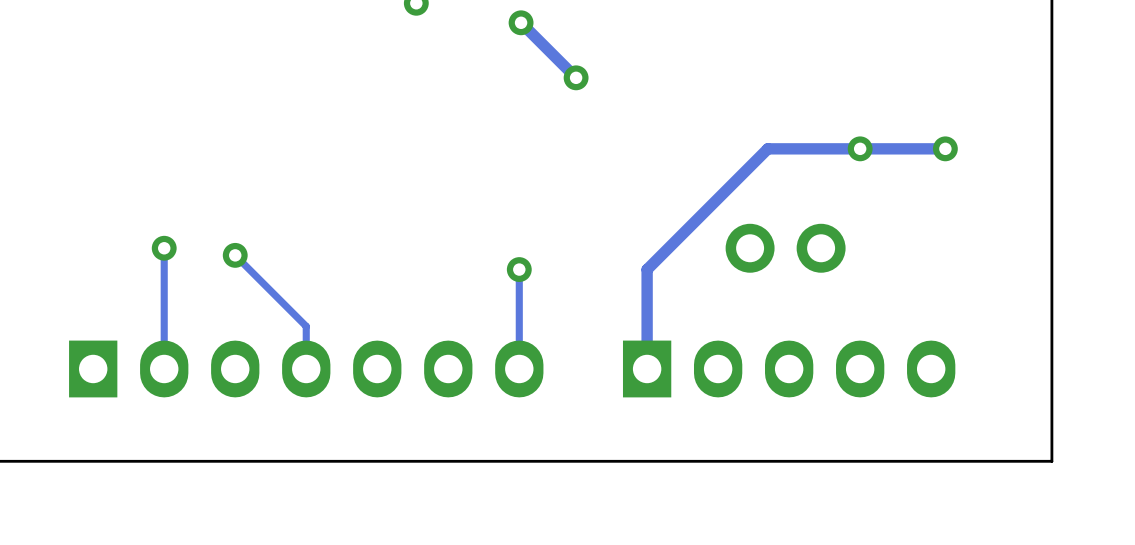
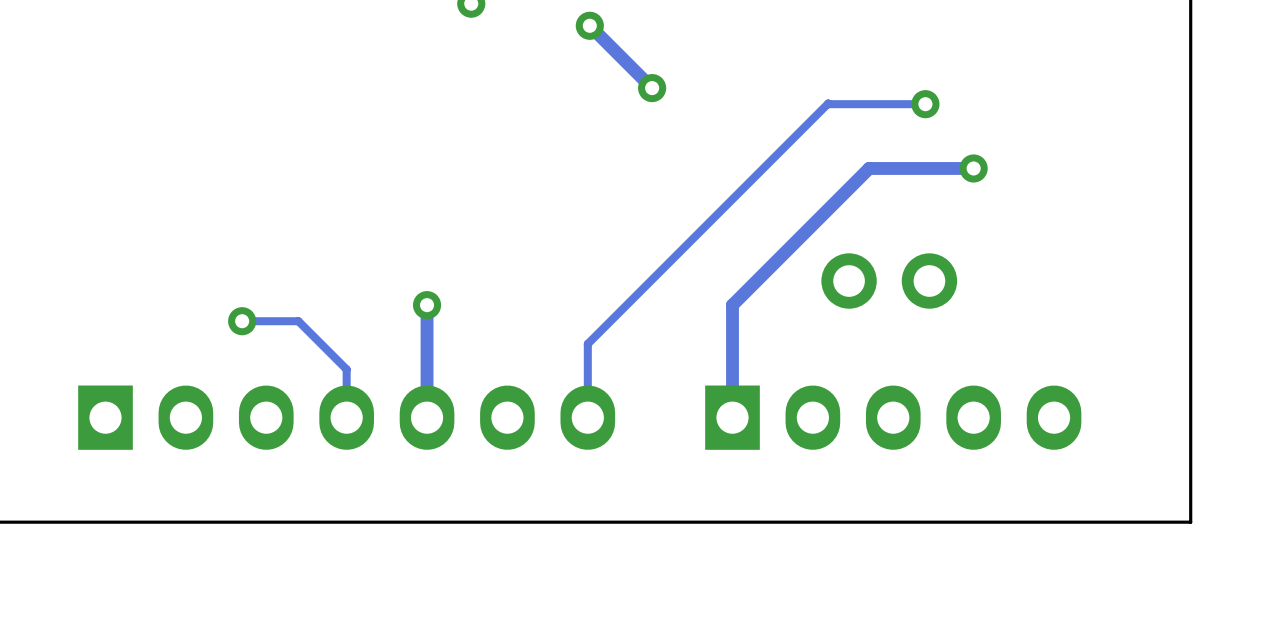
via: none -> (925, 104)
track: (945, 148) (860, 148) -> none
via: (945, 148) -> none
track: (164, 248) (164, 368) -> none
via: (164, 248) -> none
track: (235, 255) (263, 283) -> (242, 321) (298, 321)
via: (235, 255) -> none
track: none -> (427, 305) (427, 417)
via: none -> (427, 305)
track: (519, 269) (519, 303) -> (925, 104) (828, 103) (587, 343)
via: (519, 269) -> none
via: none -> (242, 321)

